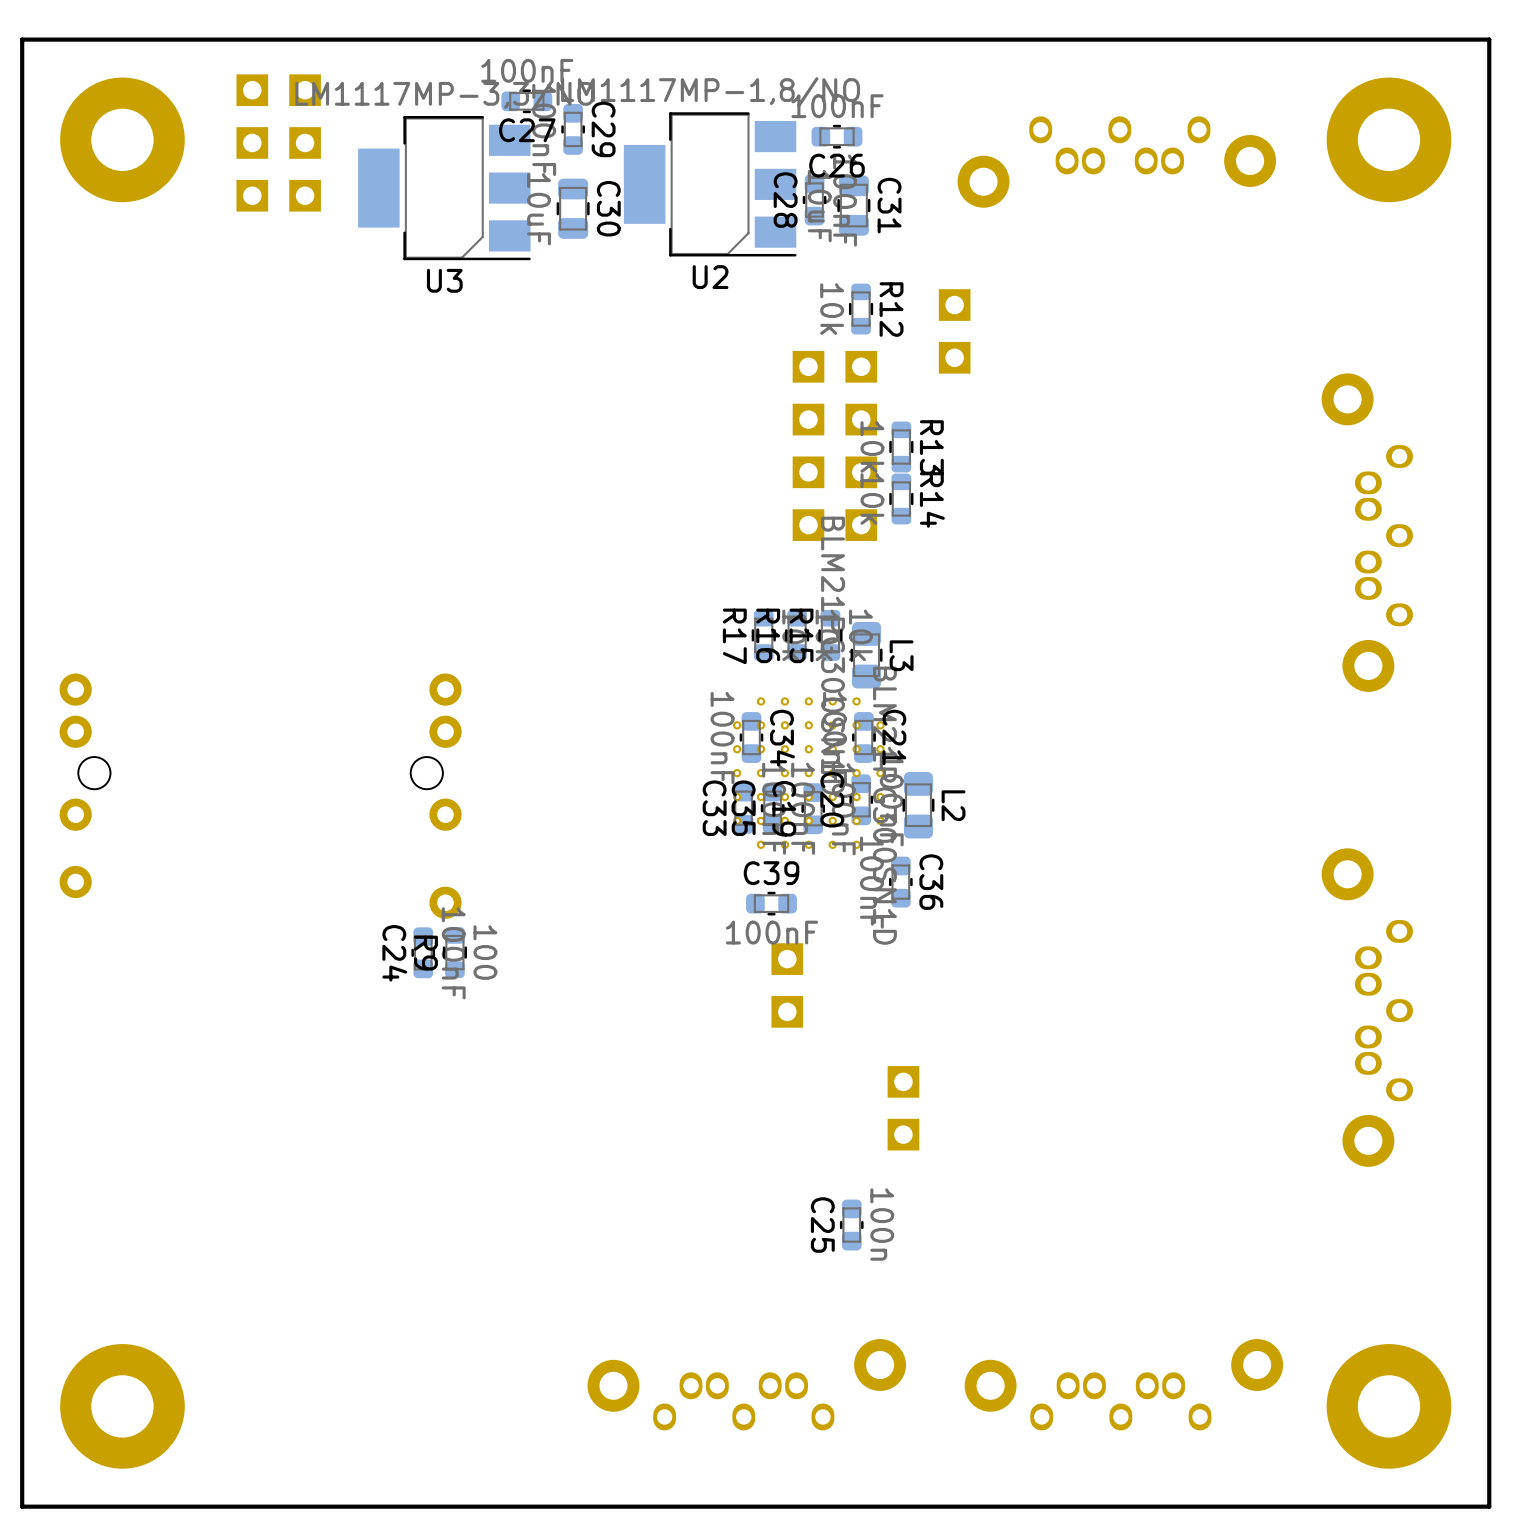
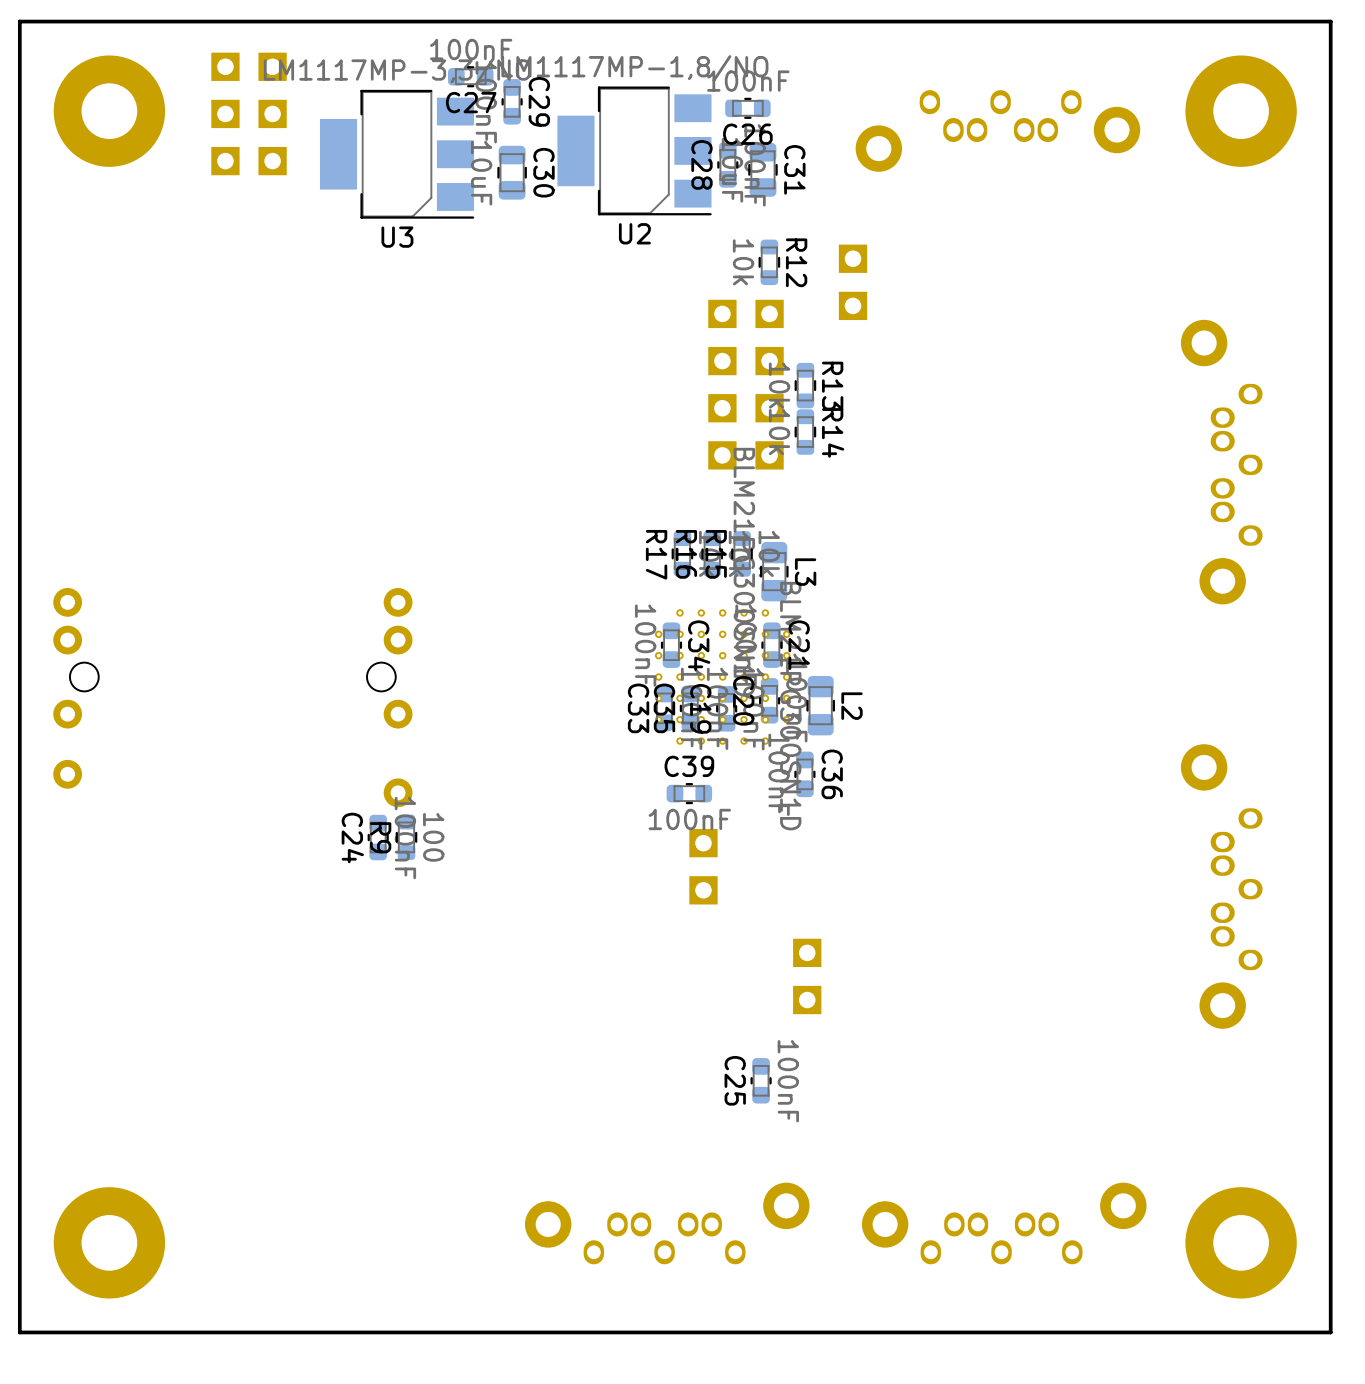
C25 value: 100n (882, 1224) -> 100nF (788, 1081)

